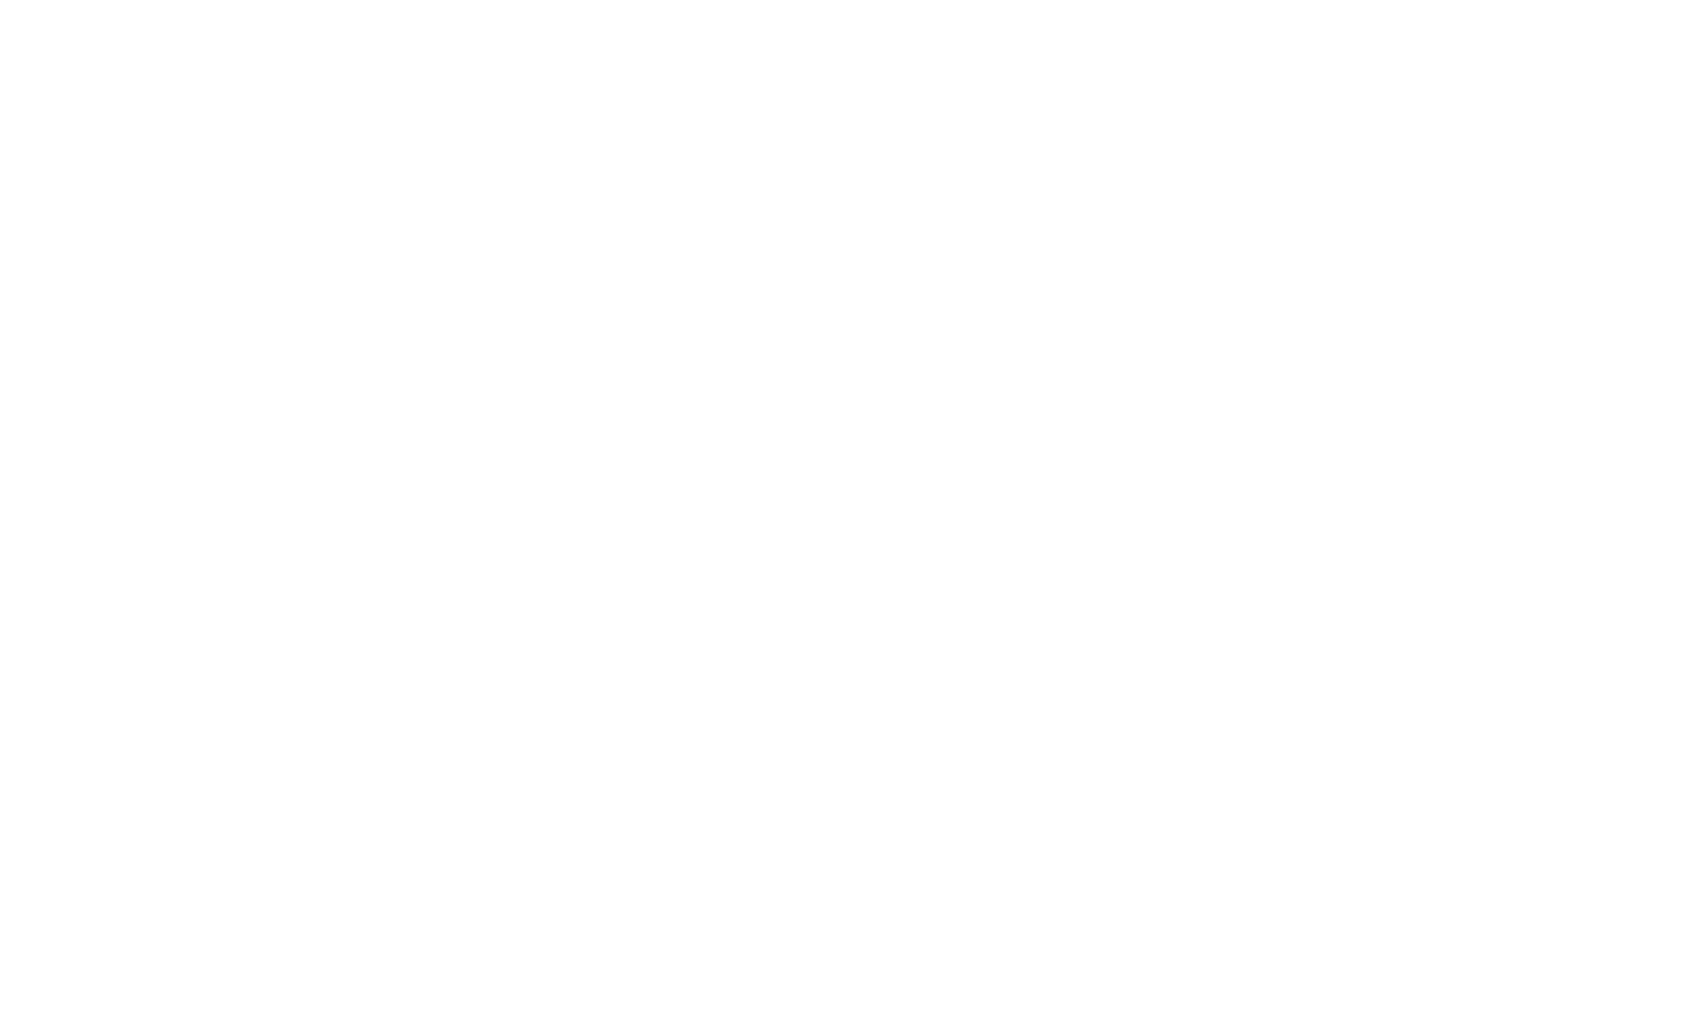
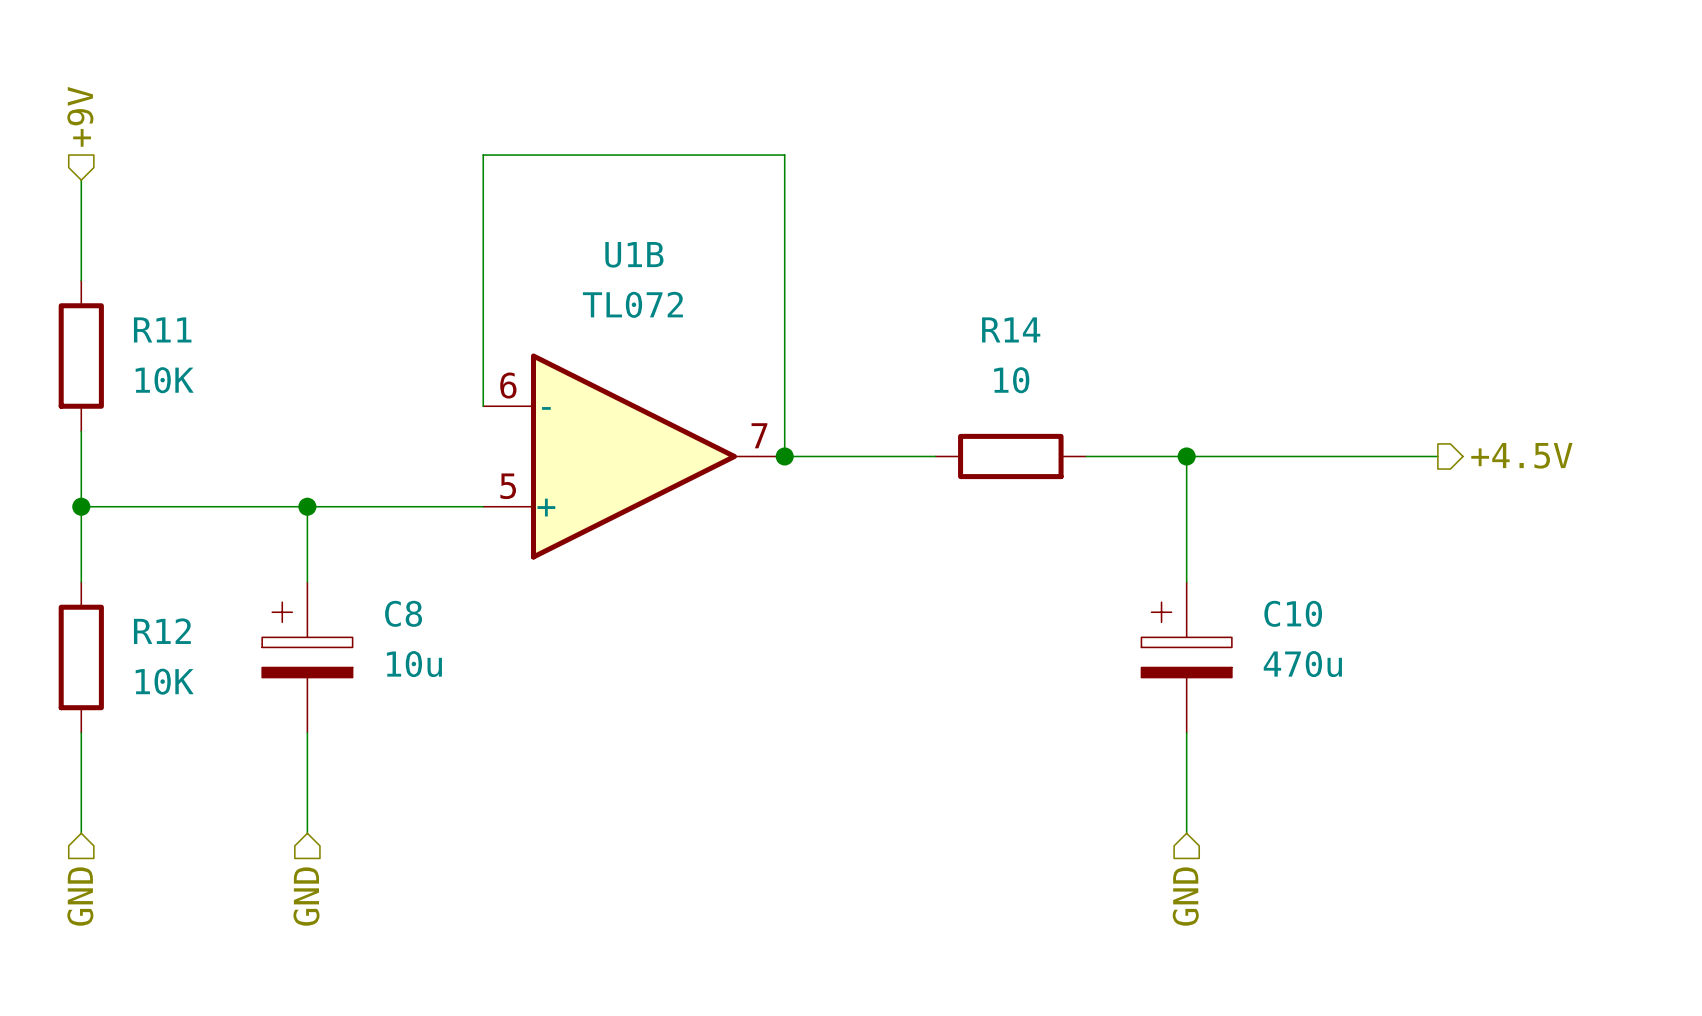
hierarchical label: none -> +9V (80, 116)
wire: none -> (81, 180) (81, 280)
R11: none -> 10K (81, 356)
wire: none -> (483, 406) (483, 155) (784, 155) (784, 456) (935, 456)
wire: none -> (81, 431) (81, 582)
hierarchical label: none -> +4.5V (1521, 455)
U1B: none -> TL072 (633, 456)
junction: none -> (784, 456)
R14: none -> 10 (1010, 456)
wire: none -> (1086, 456) (1437, 456)
wire: none -> (1186, 456) (1186, 582)
junction: none -> (1186, 456)
wire: none -> (81, 506) (483, 506)
junction: none -> (81, 506)
wire: none -> (307, 506) (307, 582)
junction: none -> (307, 506)
R12: none -> 10K (81, 657)
C8: none -> 10u (307, 657)
C10: none -> 470u (1186, 657)
wire: none -> (81, 732) (81, 833)
wire: none -> (307, 732) (307, 833)
wire: none -> (1186, 732) (1186, 833)
hierarchical label: none -> GND (80, 896)
hierarchical label: none -> GND (306, 896)
hierarchical label: none -> GND (1185, 896)

